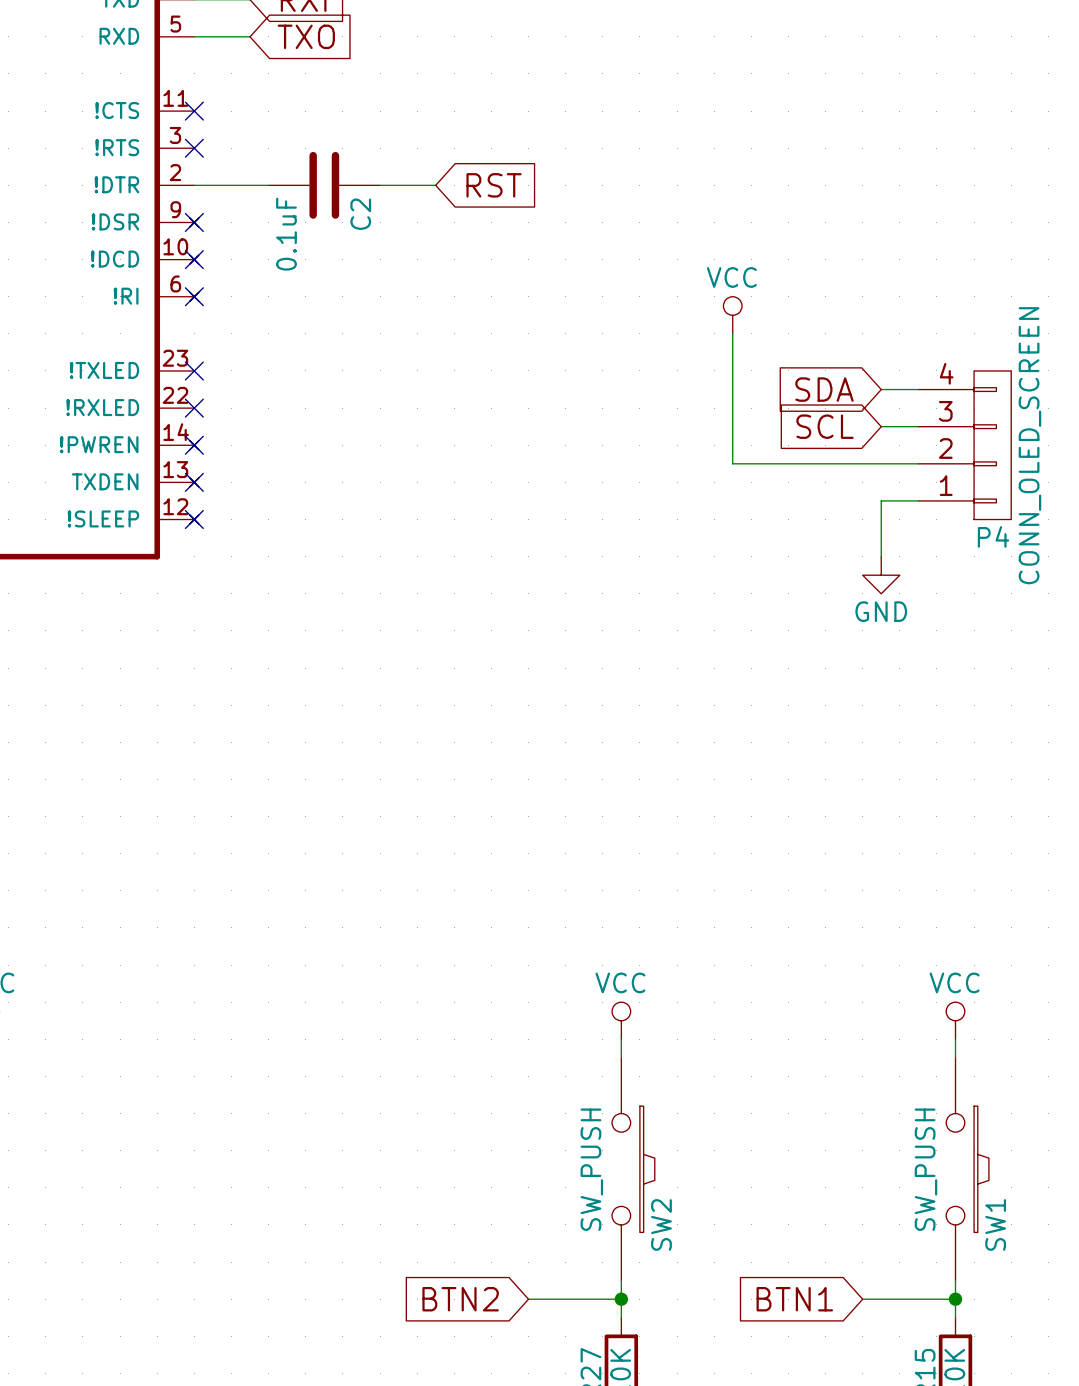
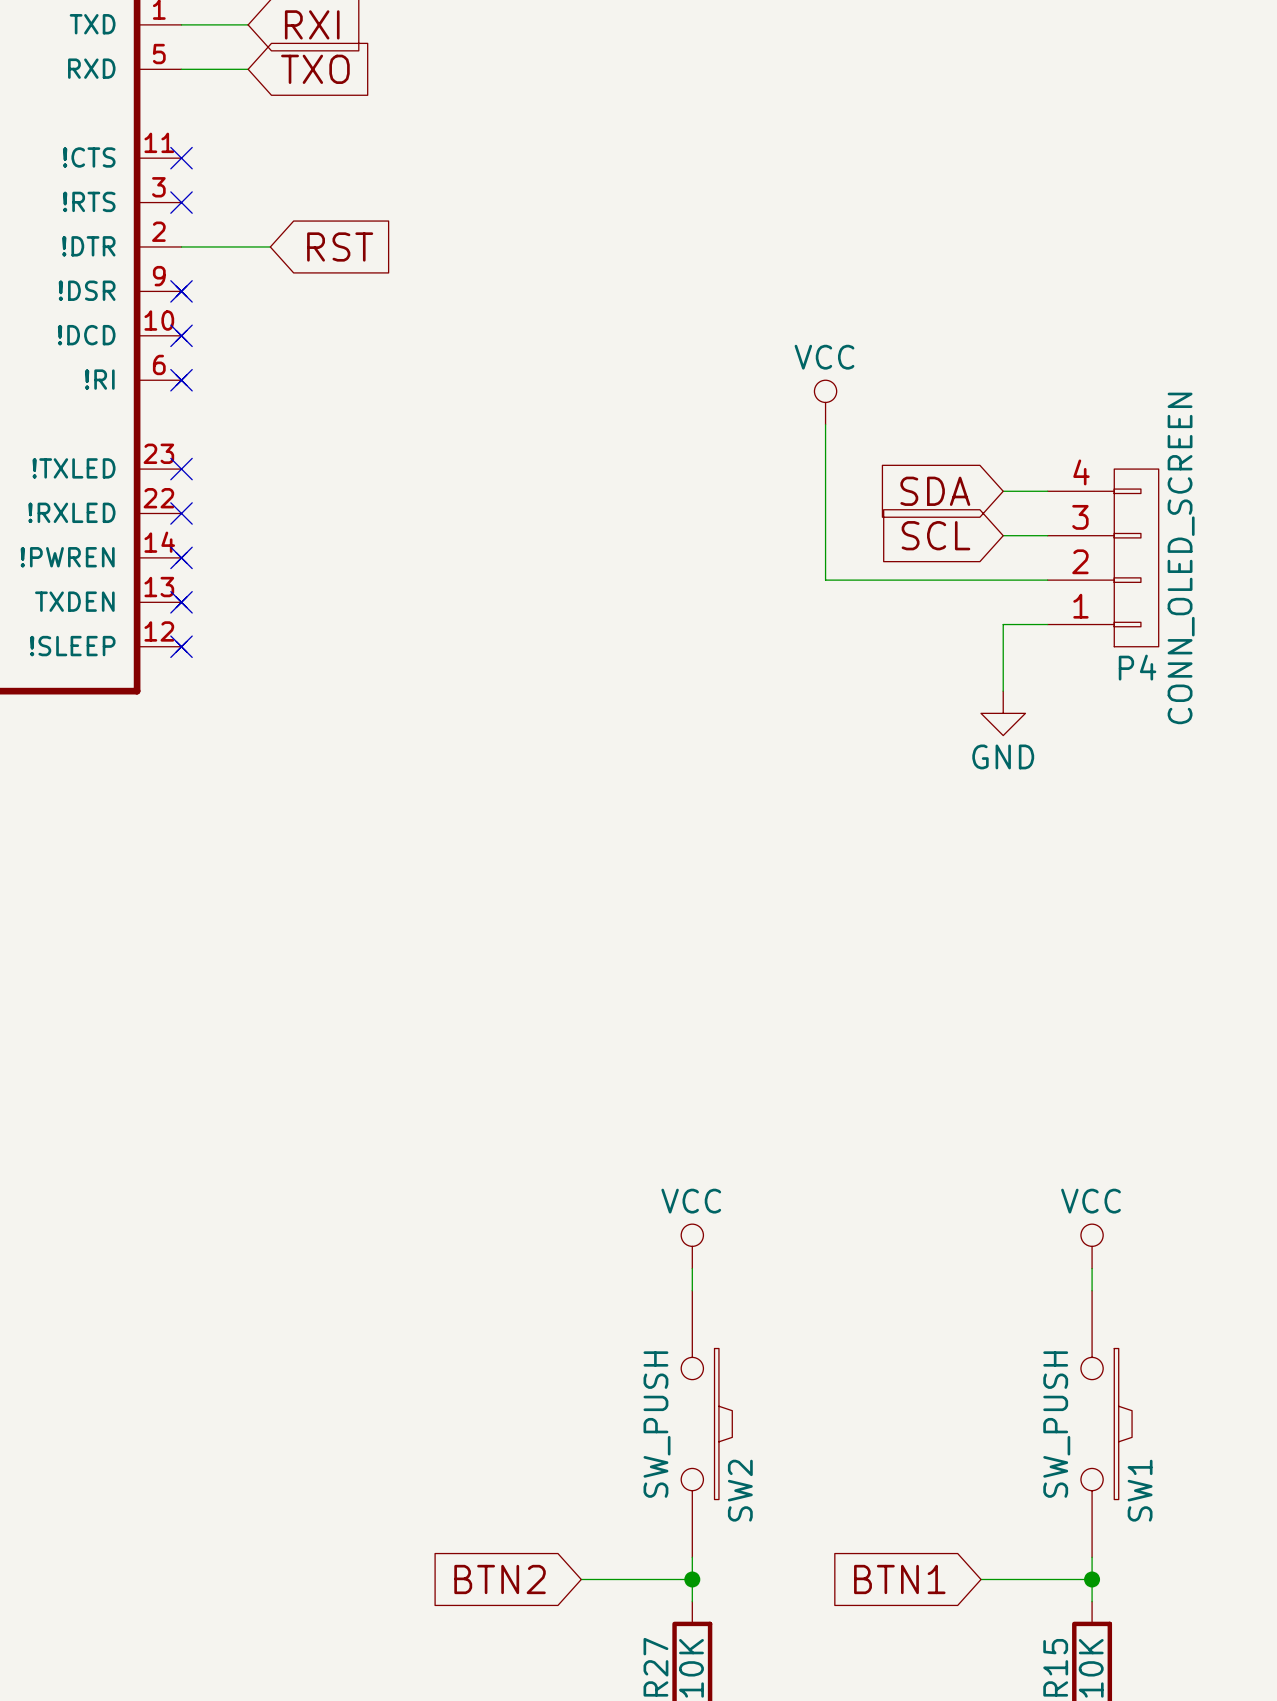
C2: 0.1uF (324, 185) -> none
wire: (380, 185) (435, 185) -> none
global label position: RST (494, 185) -> RST (340, 246)

